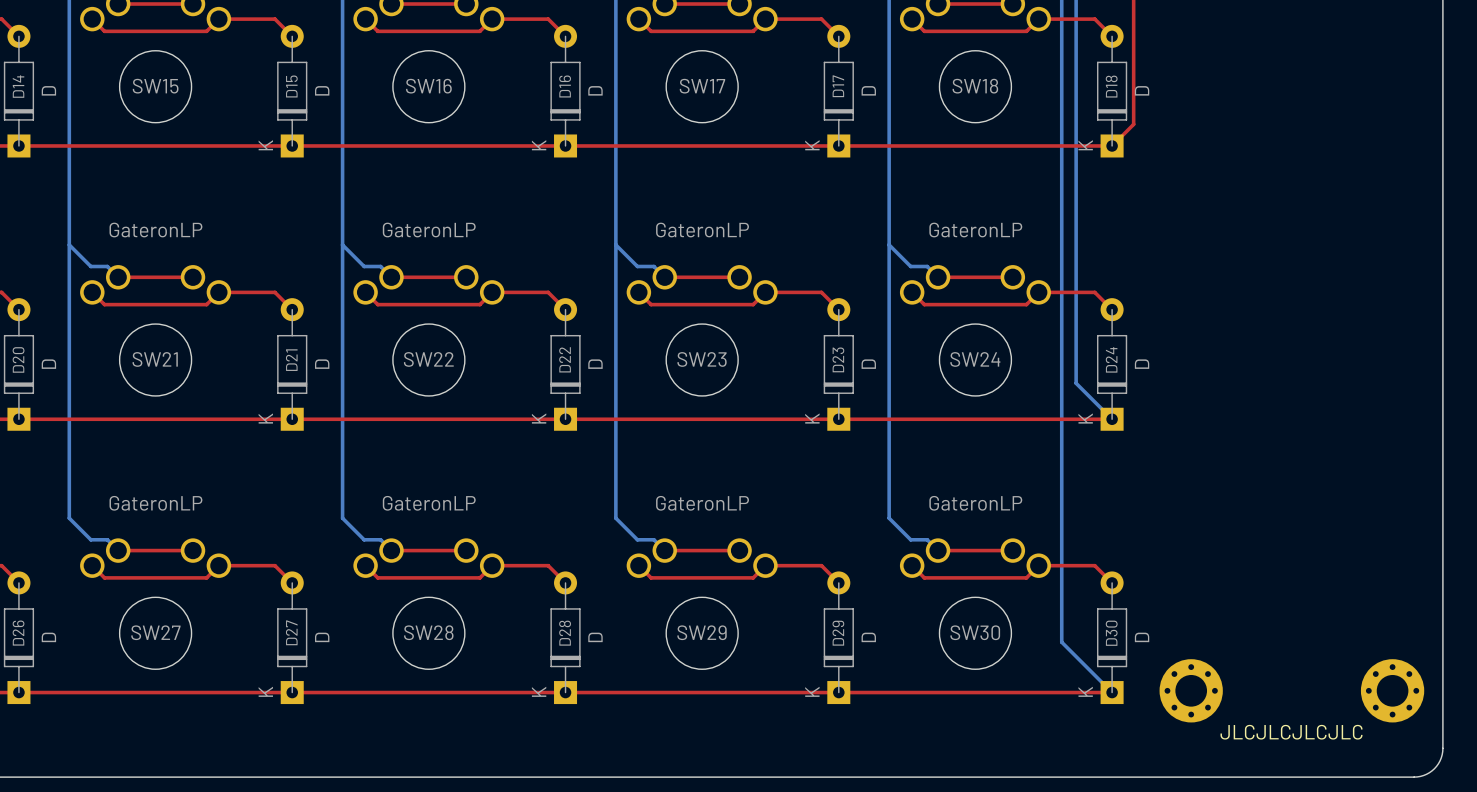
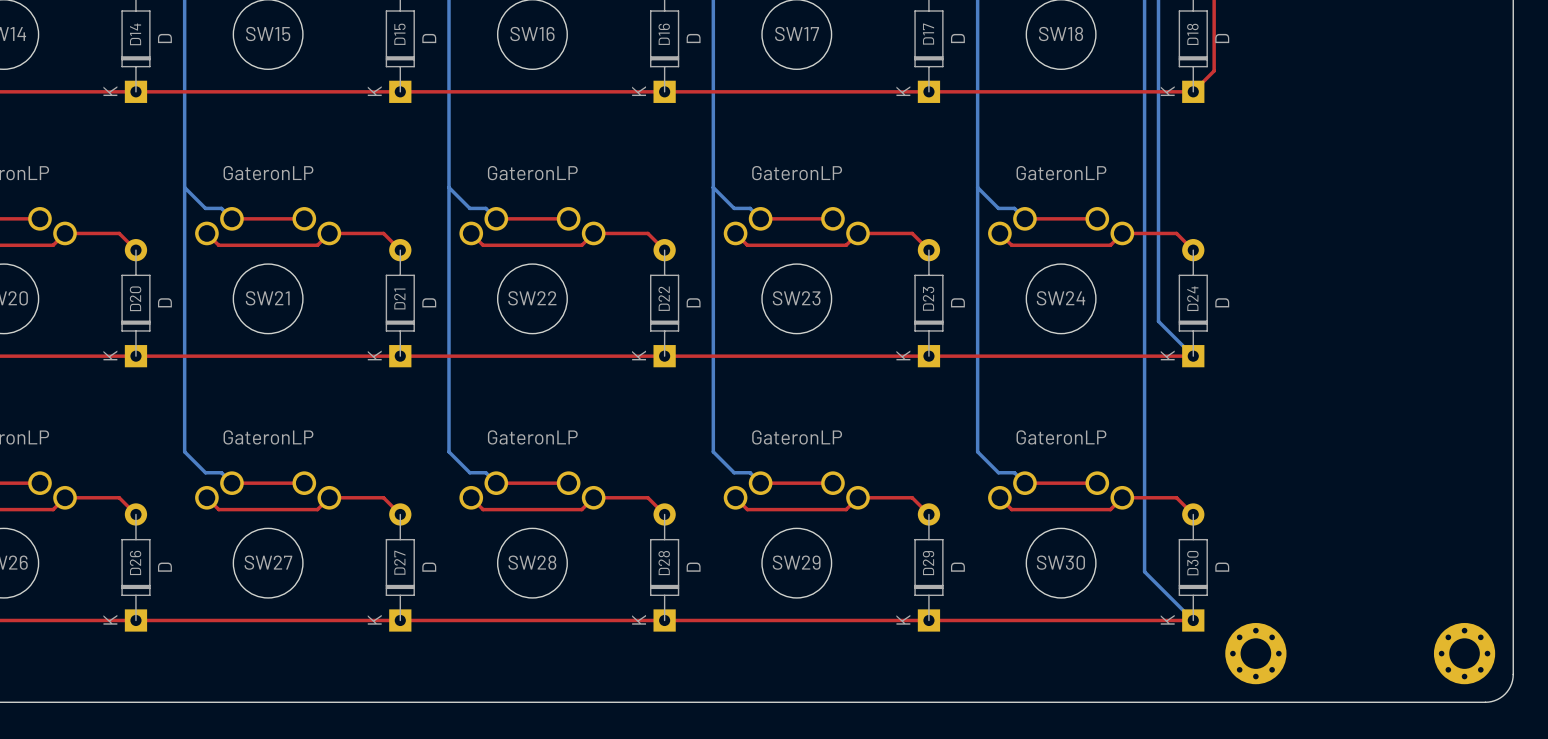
part position: (1191, 690) -> (1255, 653)
part position: (1392, 690) -> (1464, 653)
text: JLCJLCJLCJLC (1291, 732) -> none

